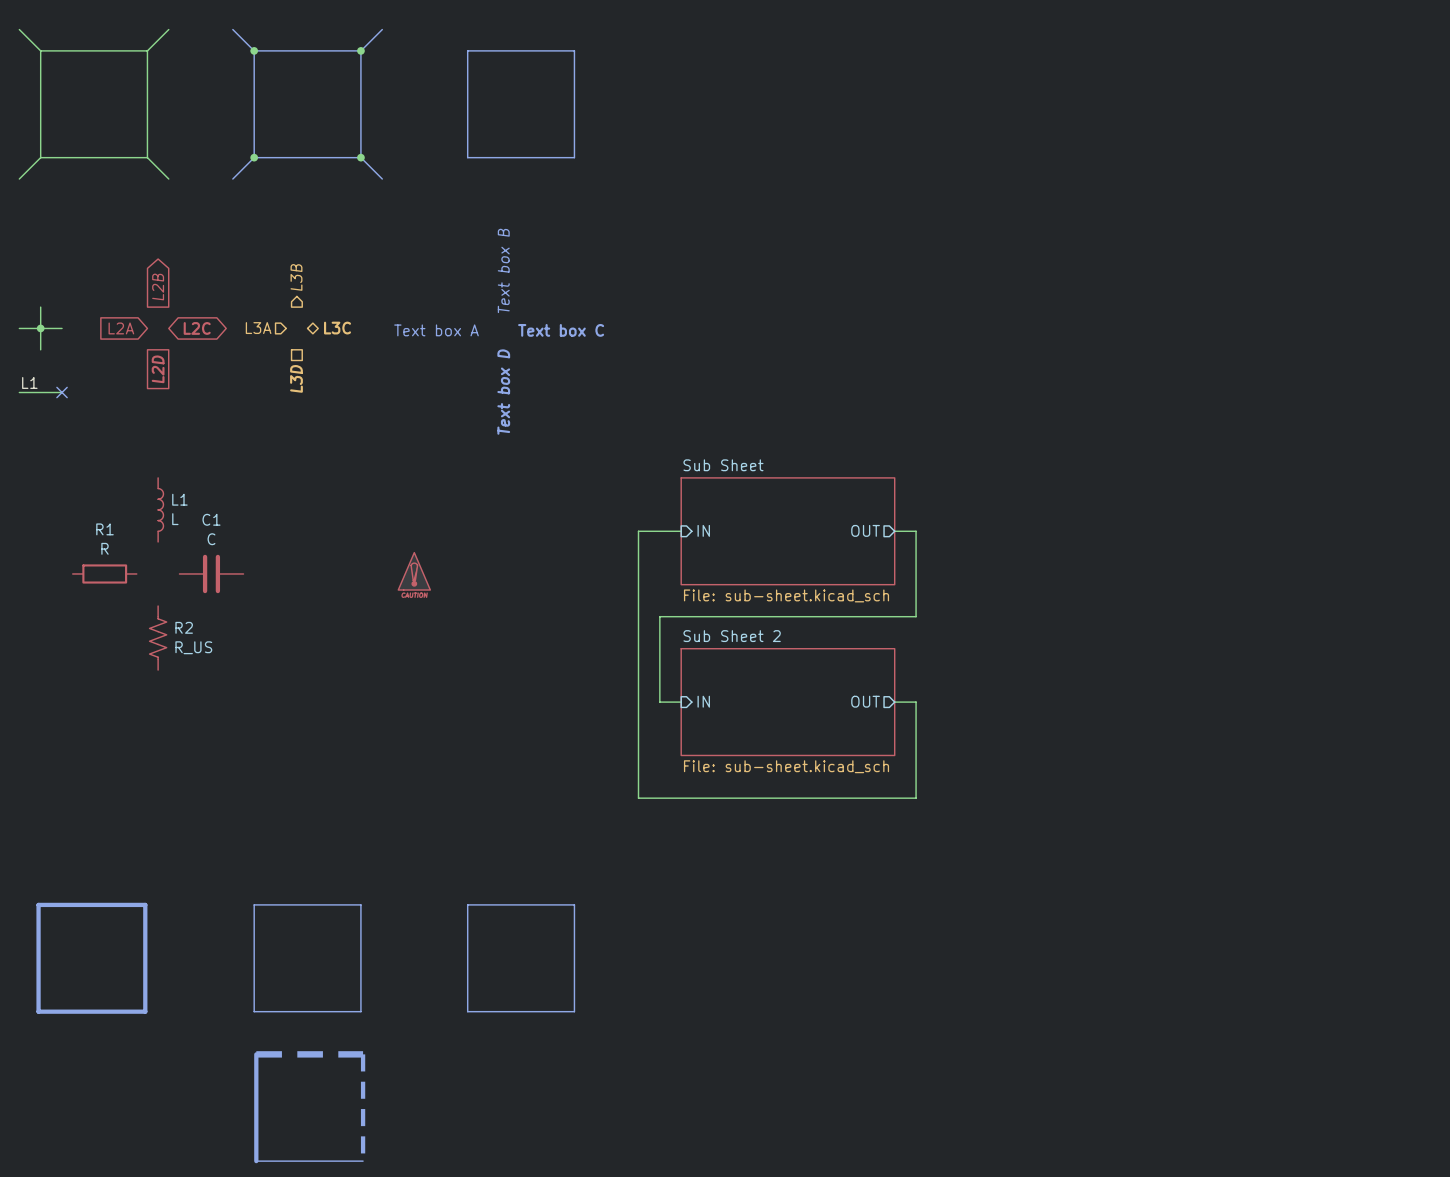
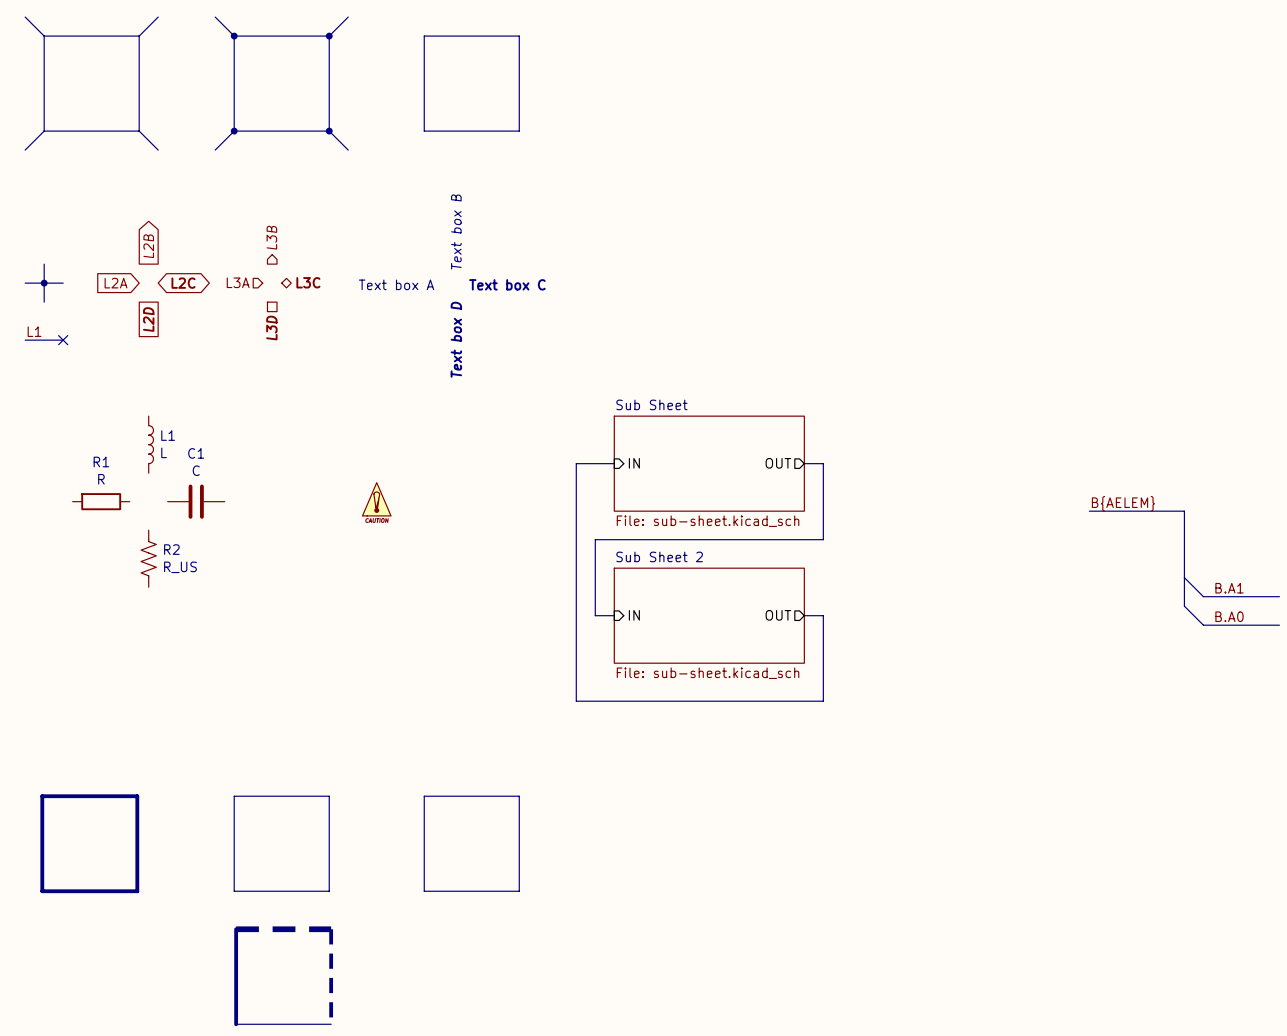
label: none -> B{AELEM} (1123, 503)
bus: none -> (1089, 511) (1184, 511) (1184, 606)
wire: none -> (1184, 577) (1203, 596) (1279, 596)
label: none -> B.A1 (1229, 588)
wire: none -> (1184, 606) (1203, 625) (1279, 625)
label: none -> B.A0 (1229, 616)

